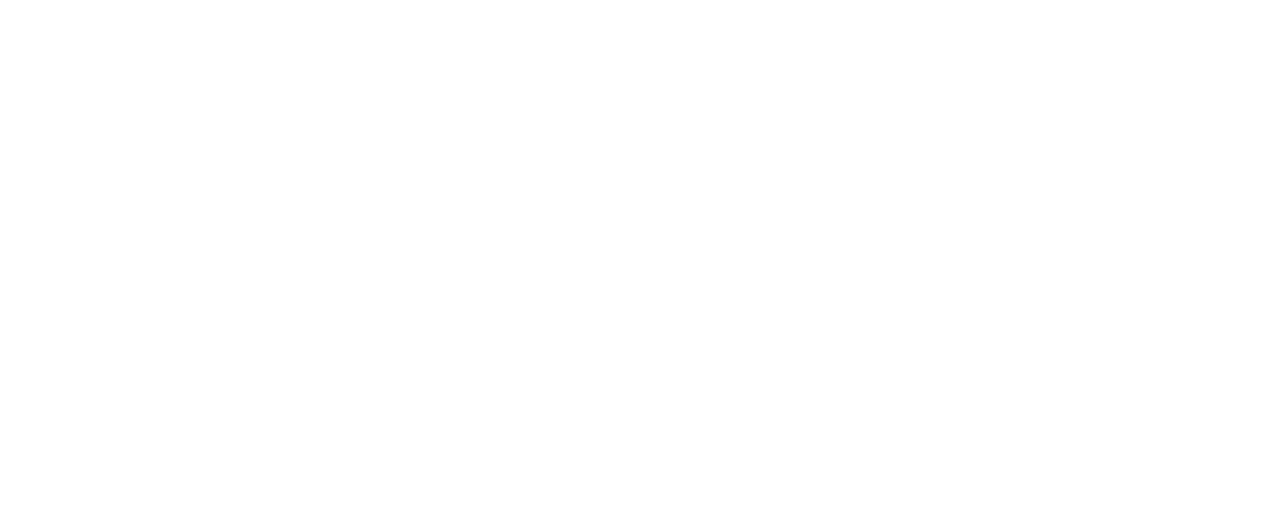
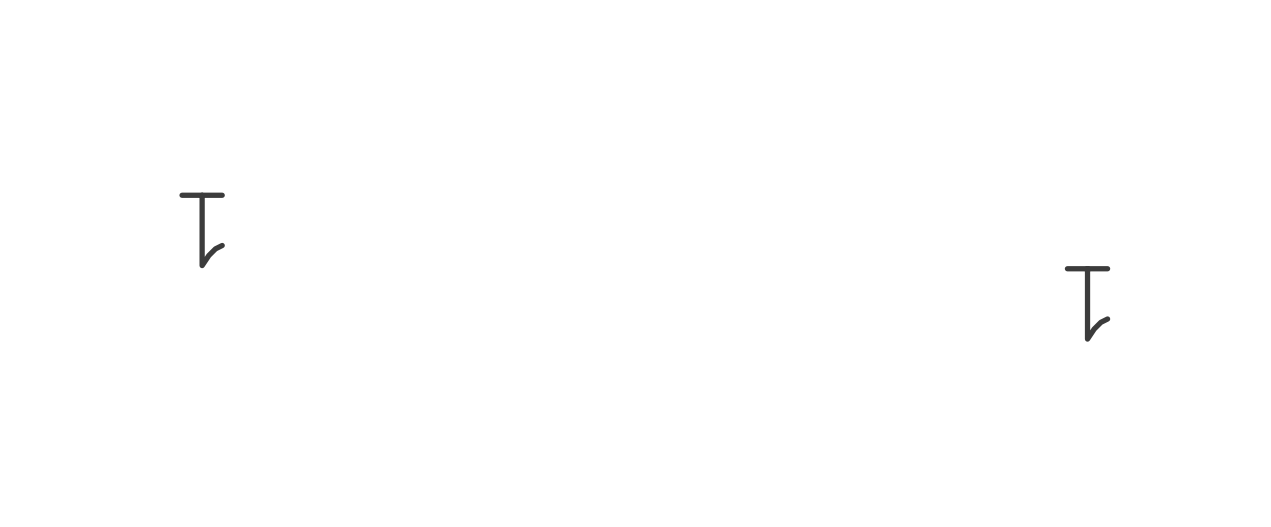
text: none -> 1 (202, 230)
text: none -> 1 (1087, 303)

